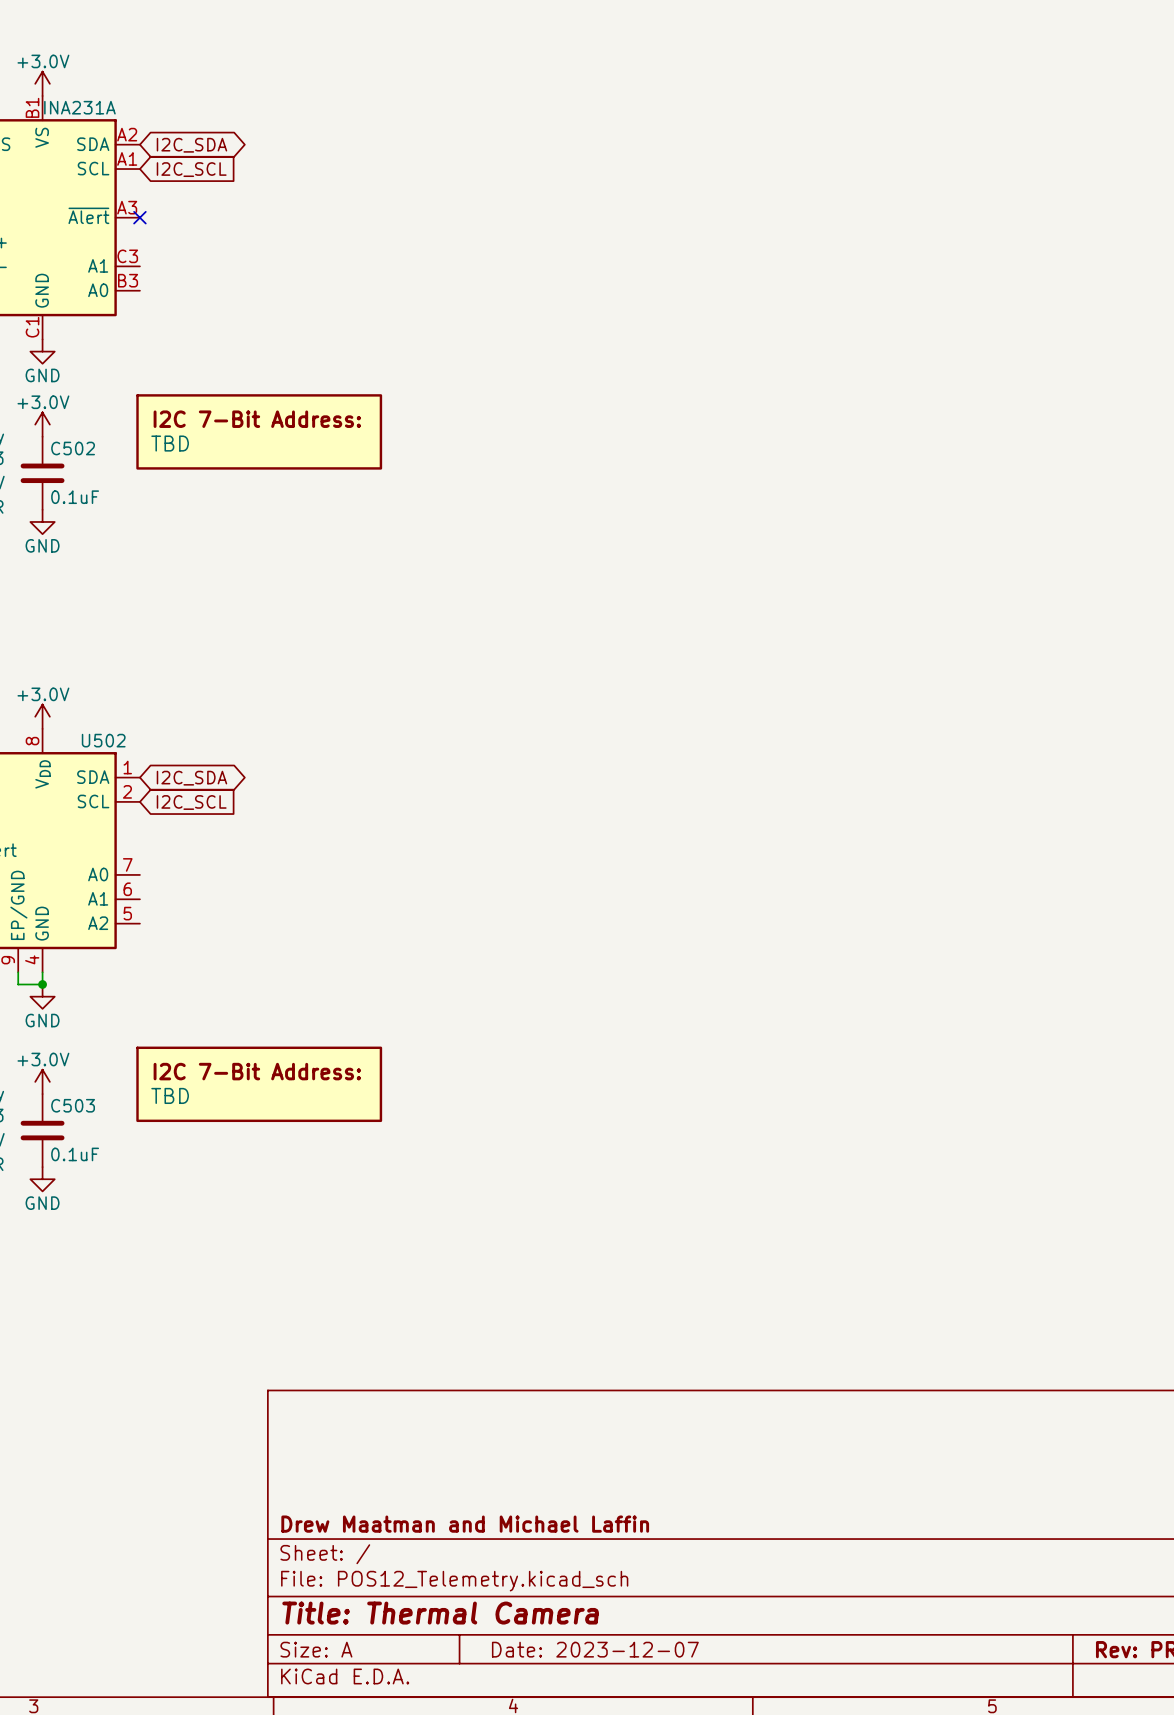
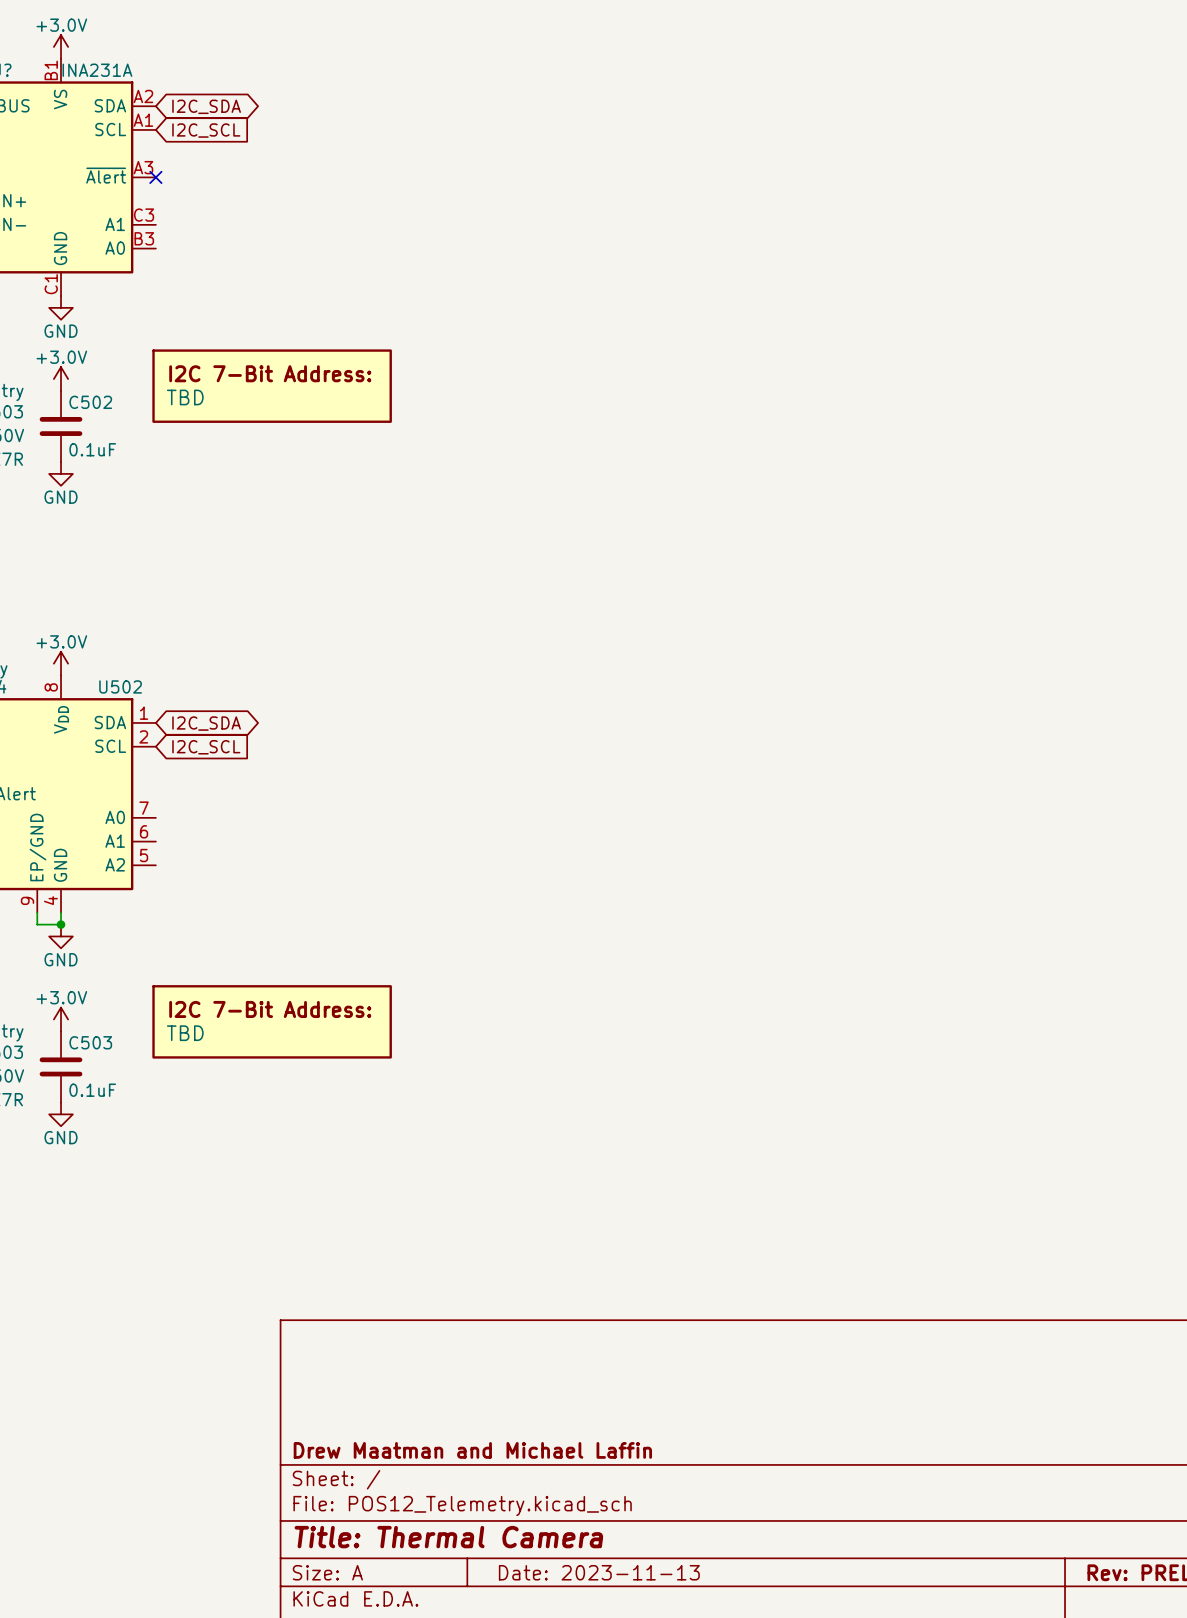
title block: Date: 2023-12-07 (595, 1649) -> Date: 2023-11-13 (599, 1572)

